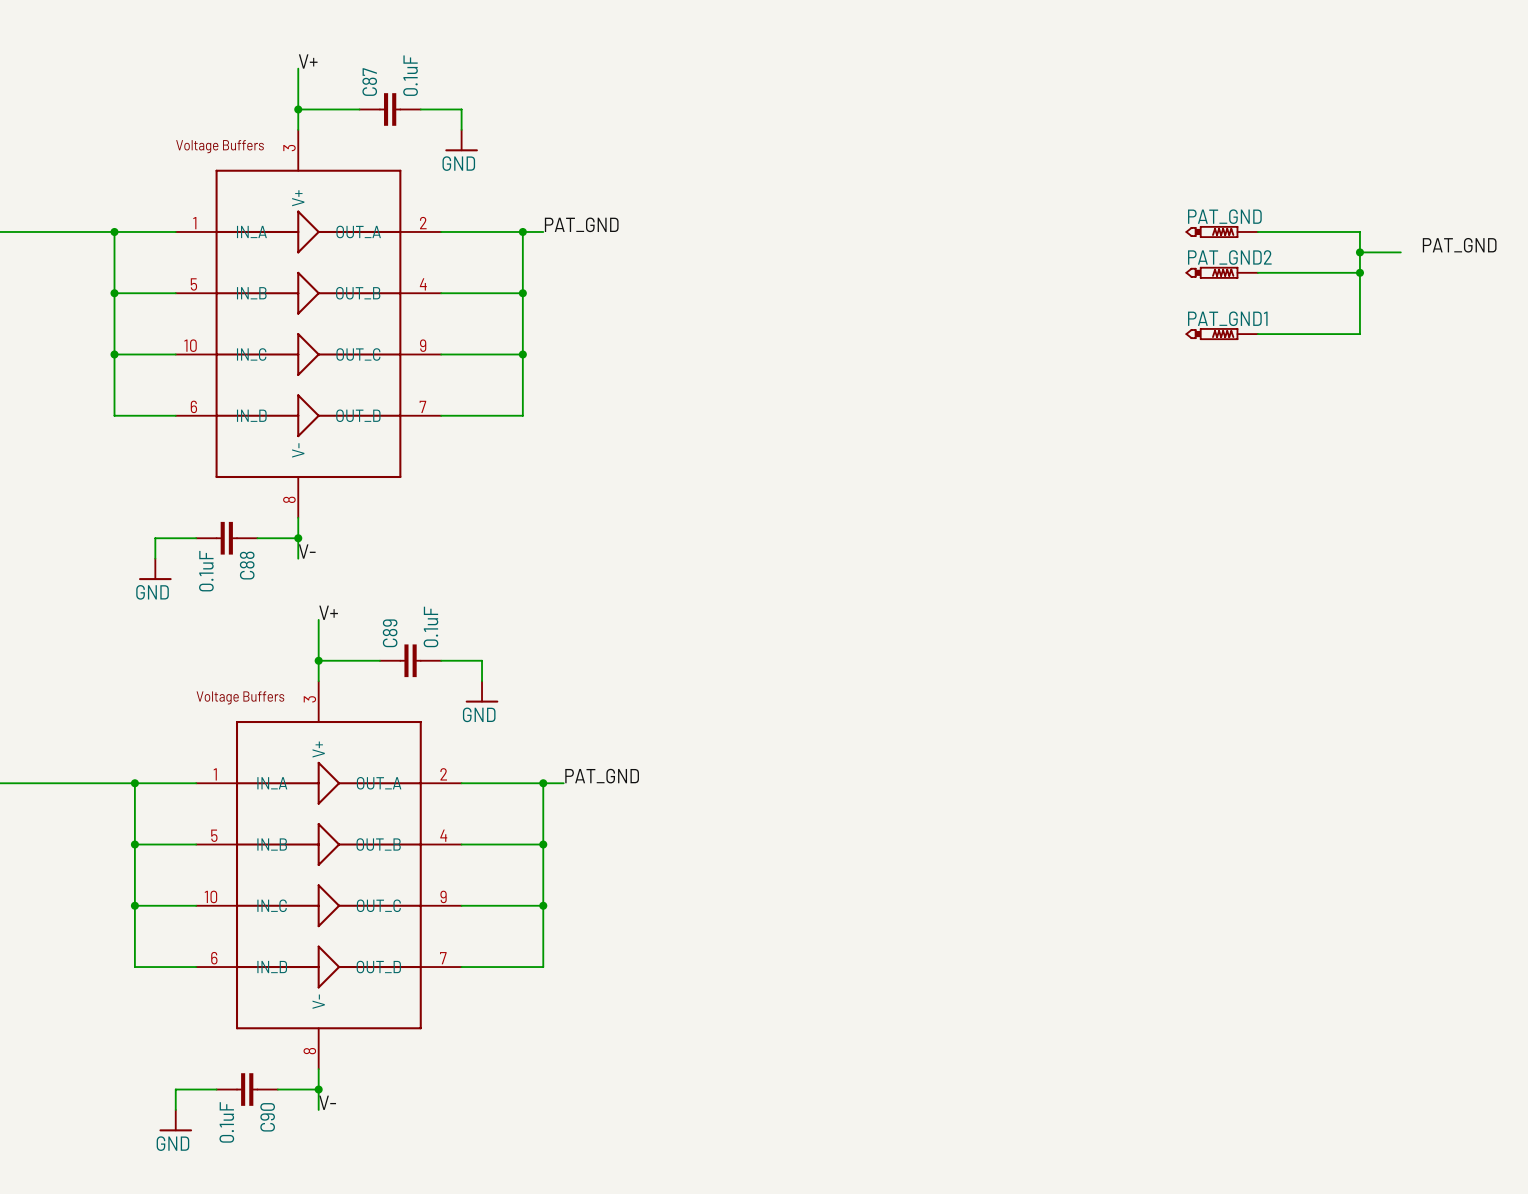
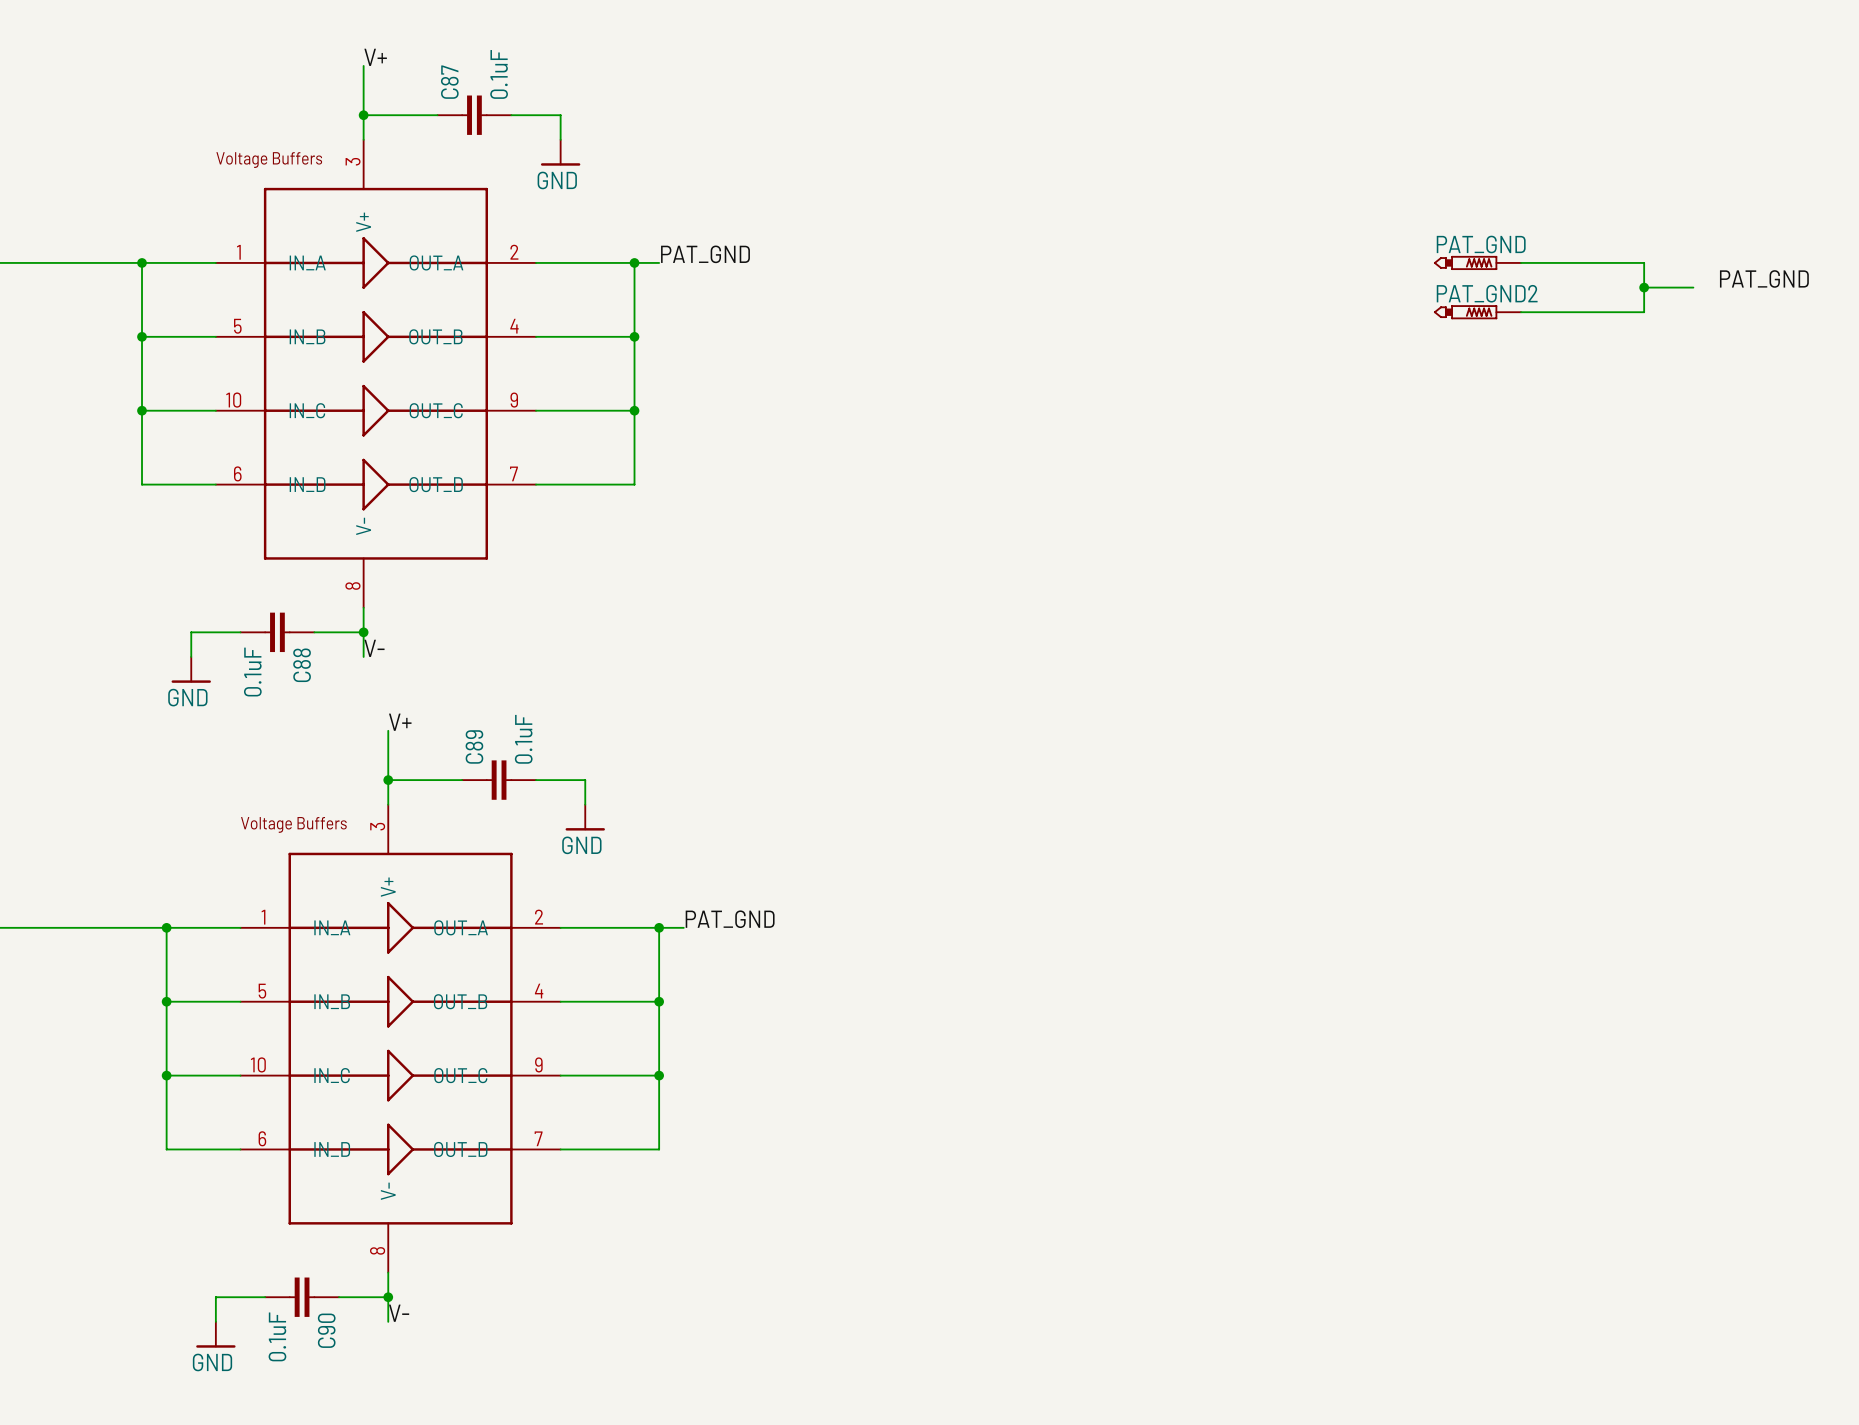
wire: (1359, 272) (1359, 334) (1257, 334) -> none
junction: (1359, 272) -> none
PAT_GND1: (1221, 334) -> none

